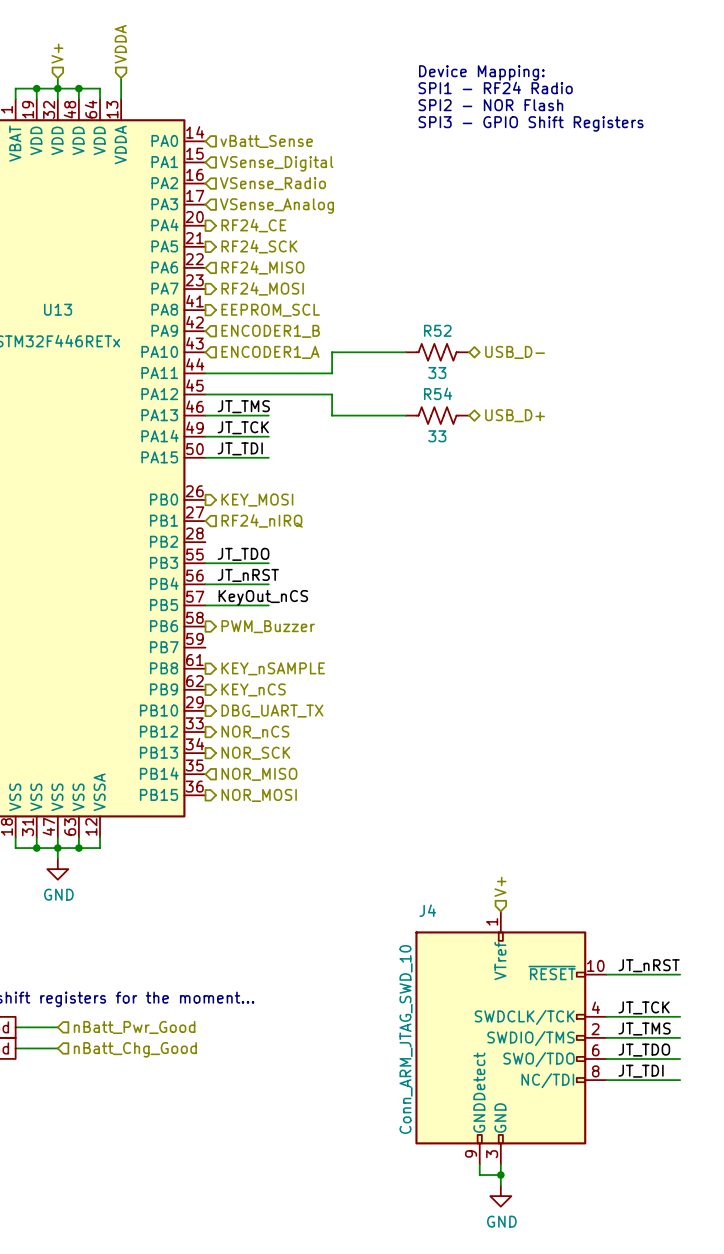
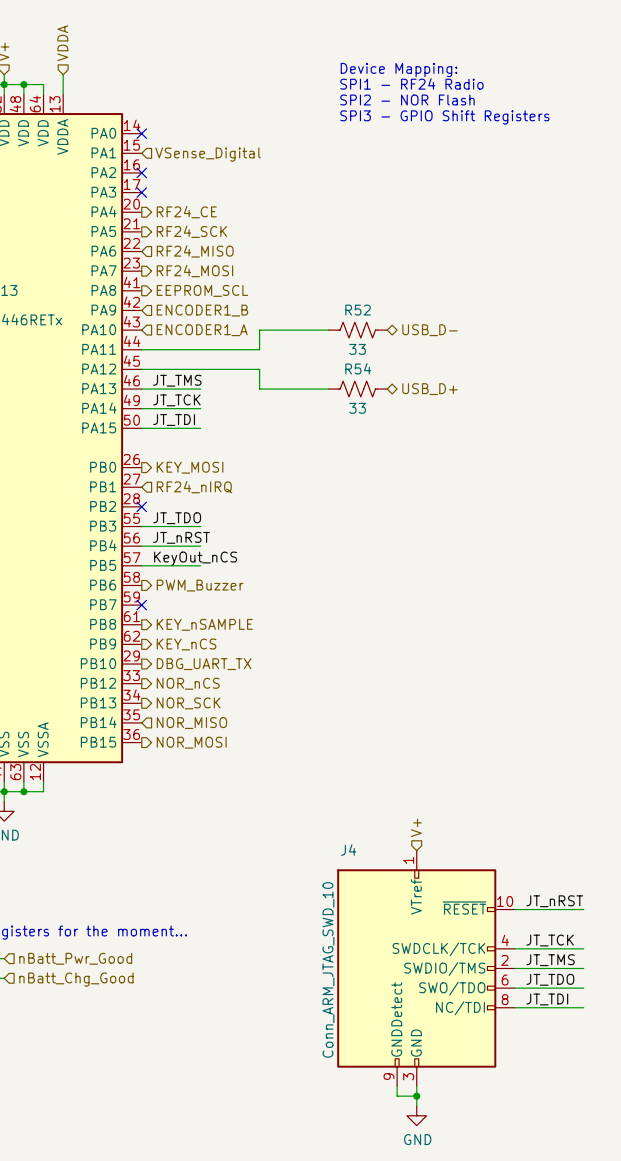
no-connect mark: none -> (141, 133)
hierarchical label: vBatt_Sense (266, 141) -> none
no-connect mark: none -> (141, 172)
hierarchical label: VSense_Radio (272, 183) -> none
no-connect mark: none -> (141, 192)
hierarchical label: VSense_Analog (276, 206) -> none
no-connect mark: none -> (141, 506)
no-connect mark: none -> (141, 605)

